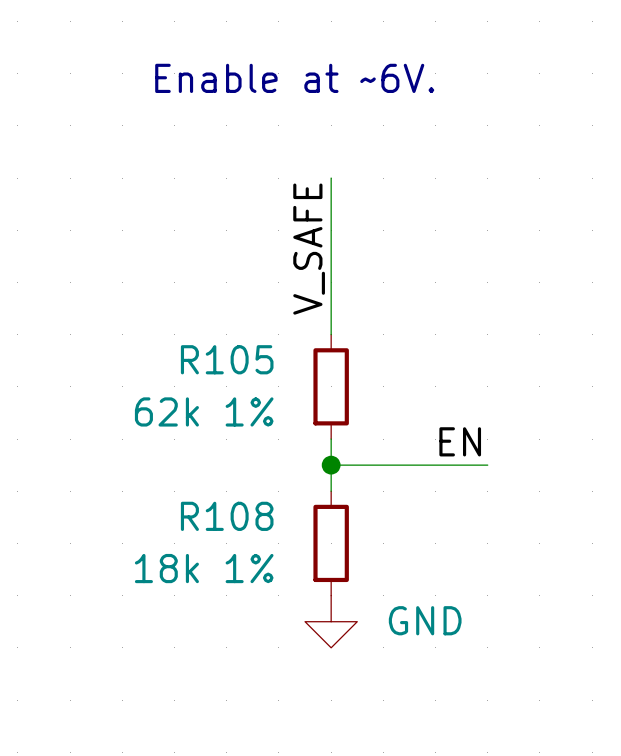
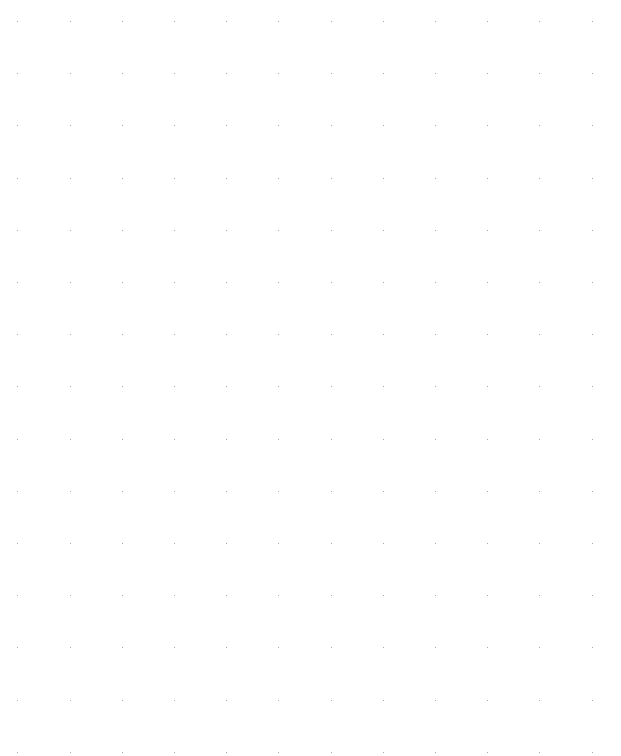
text: Enable at ~6V. (294, 78) -> none
wire: (331, 178) (331, 334) -> none
label: V_SAFE (309, 249) -> none
R105: 62k 1% (331, 386) -> none
wire: (331, 439) (331, 491) -> none
label: EN (460, 441) -> none
wire: (331, 465) (487, 465) -> none
junction: (331, 465) -> none
R108: 18k 1% (331, 543) -> none
power symbol: GND (331, 621) -> none

